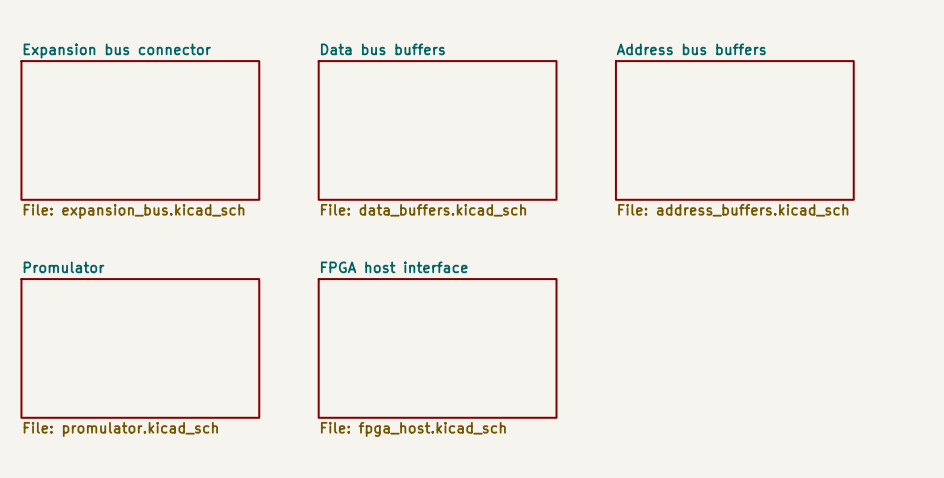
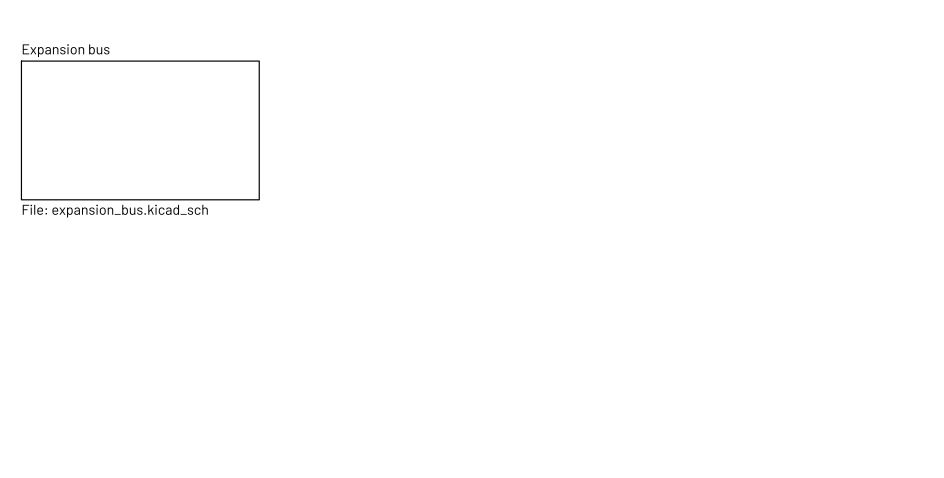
sheet Expansion bus connector name: Expansion bus connector (117, 51) -> Expansion bus (66, 50)
sheet Data bus buffers: File: data_buffers.kicad_sch (437, 130) -> none
sheet Address bus buffers: File: address_buffers.kicad_sch (734, 130) -> none
sheet Promulator: File: promulator.kicad_sch (140, 348) -> none
sheet FPGA host interface: File: fpga_host.kicad_sch (437, 348) -> none

